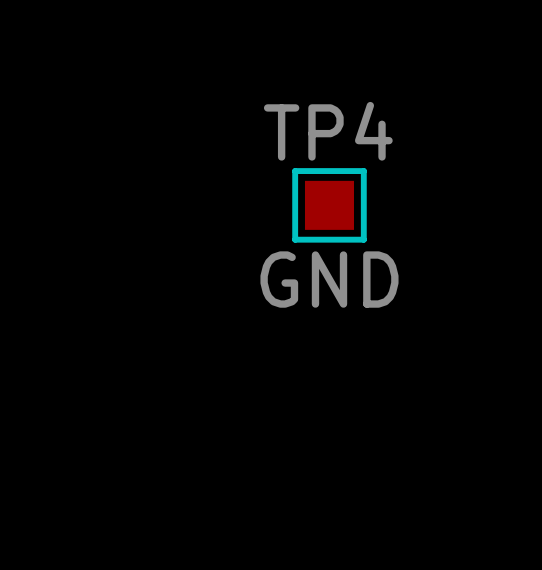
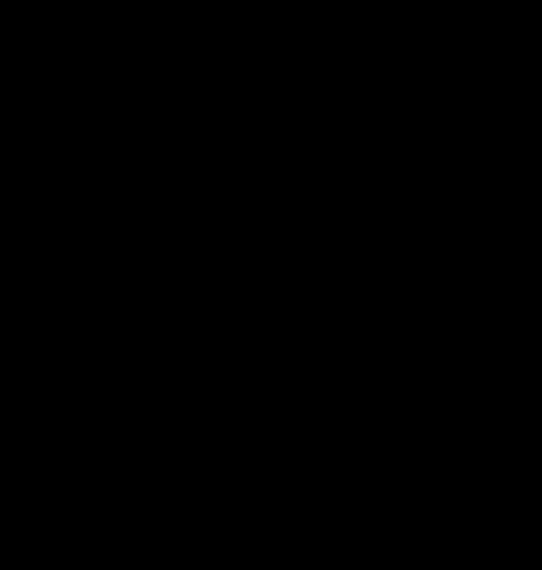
TP4: GND (329, 205) -> none

